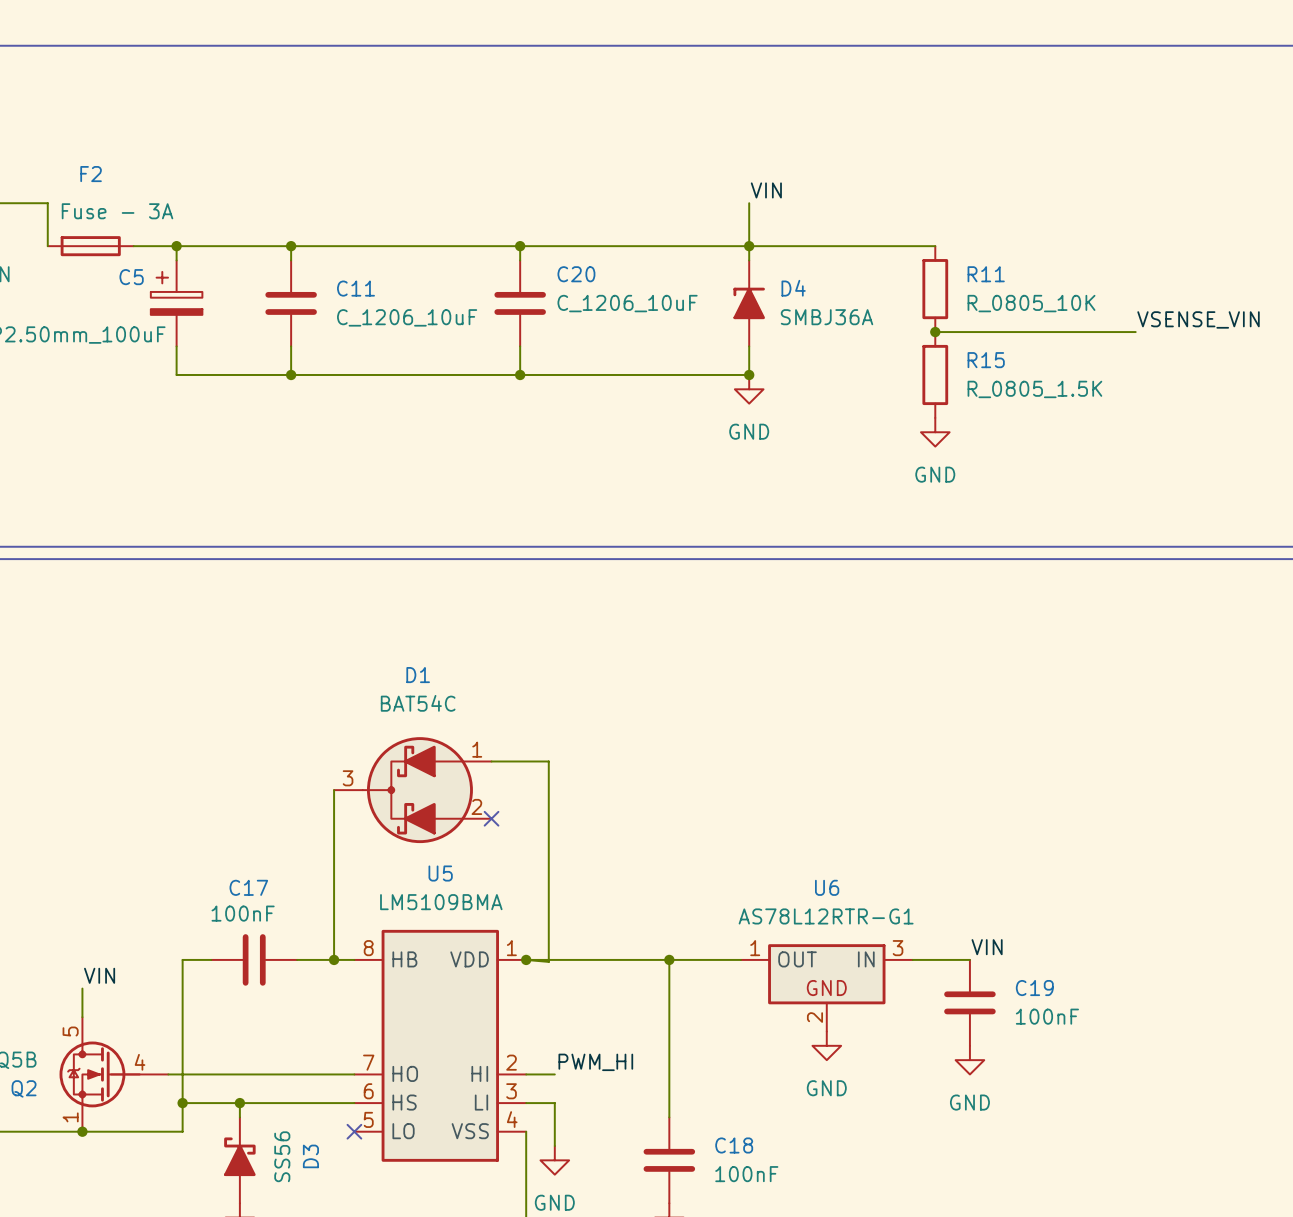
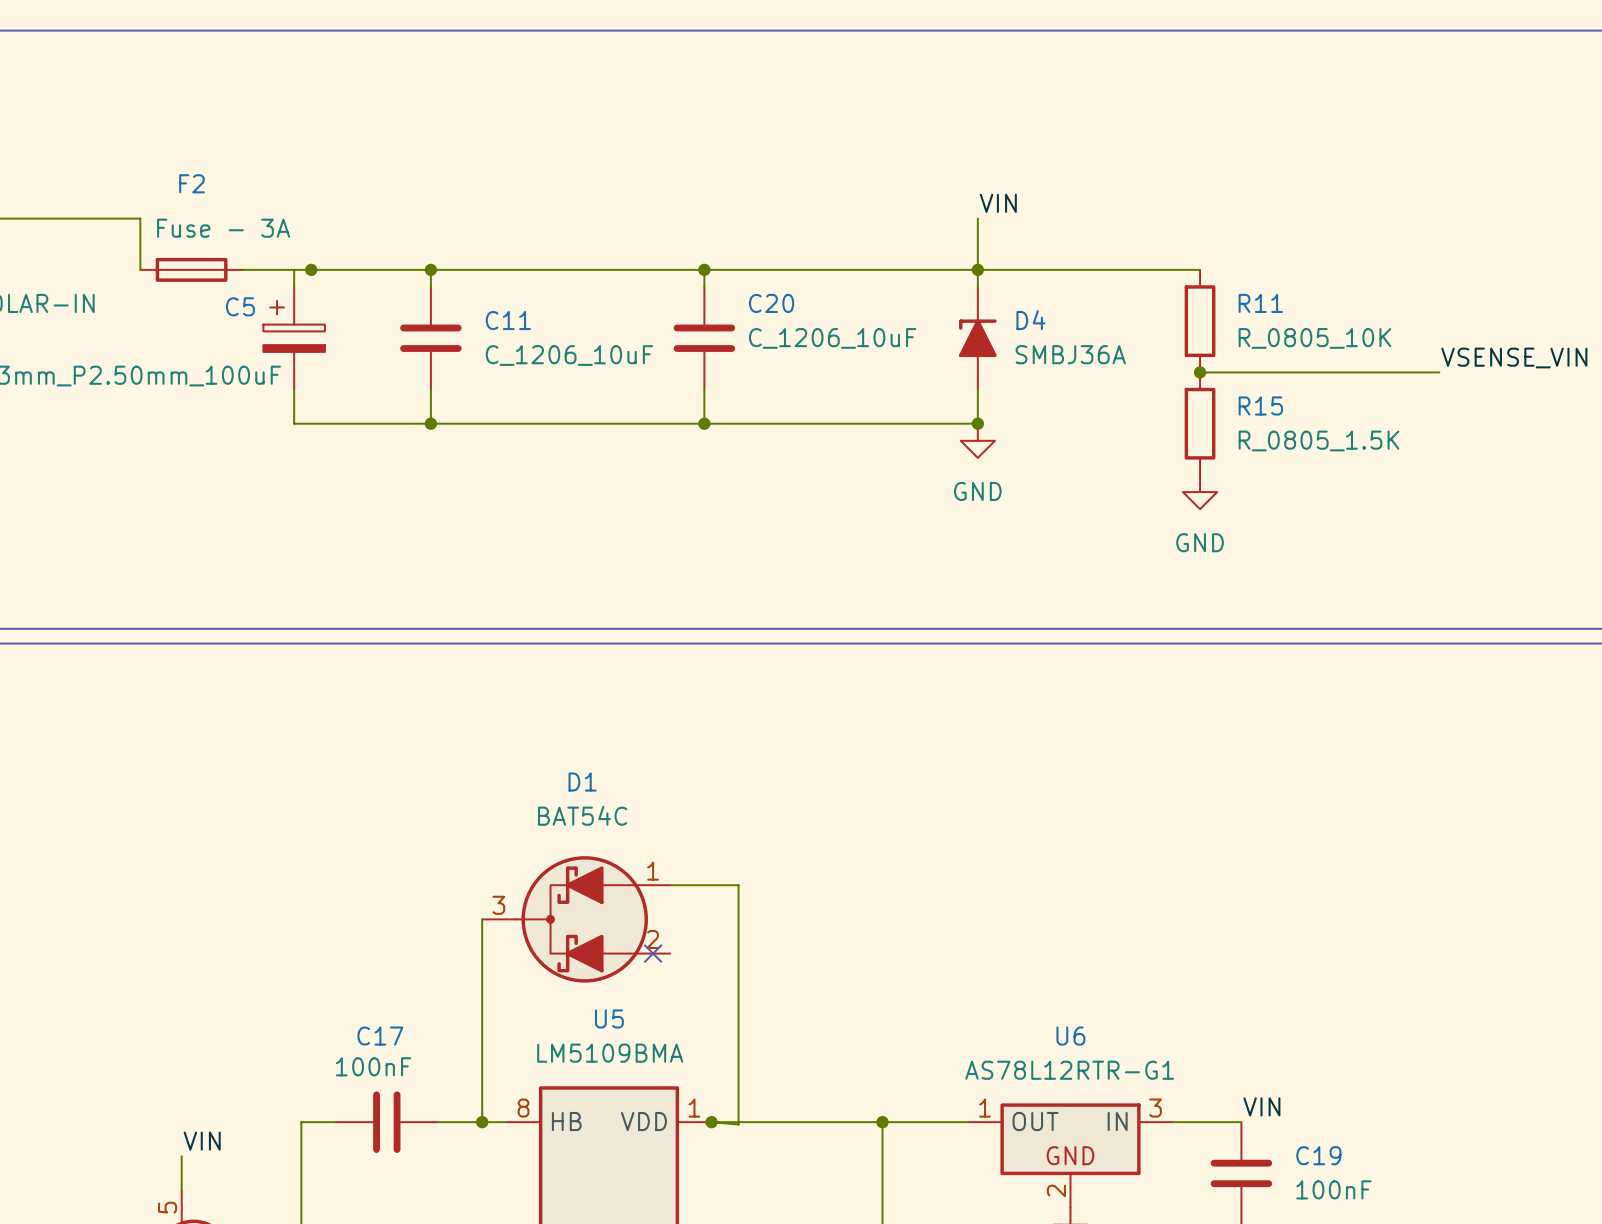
junction position: (176, 246) -> (311, 269)
no-connect mark position: (491, 818) -> (653, 953)

